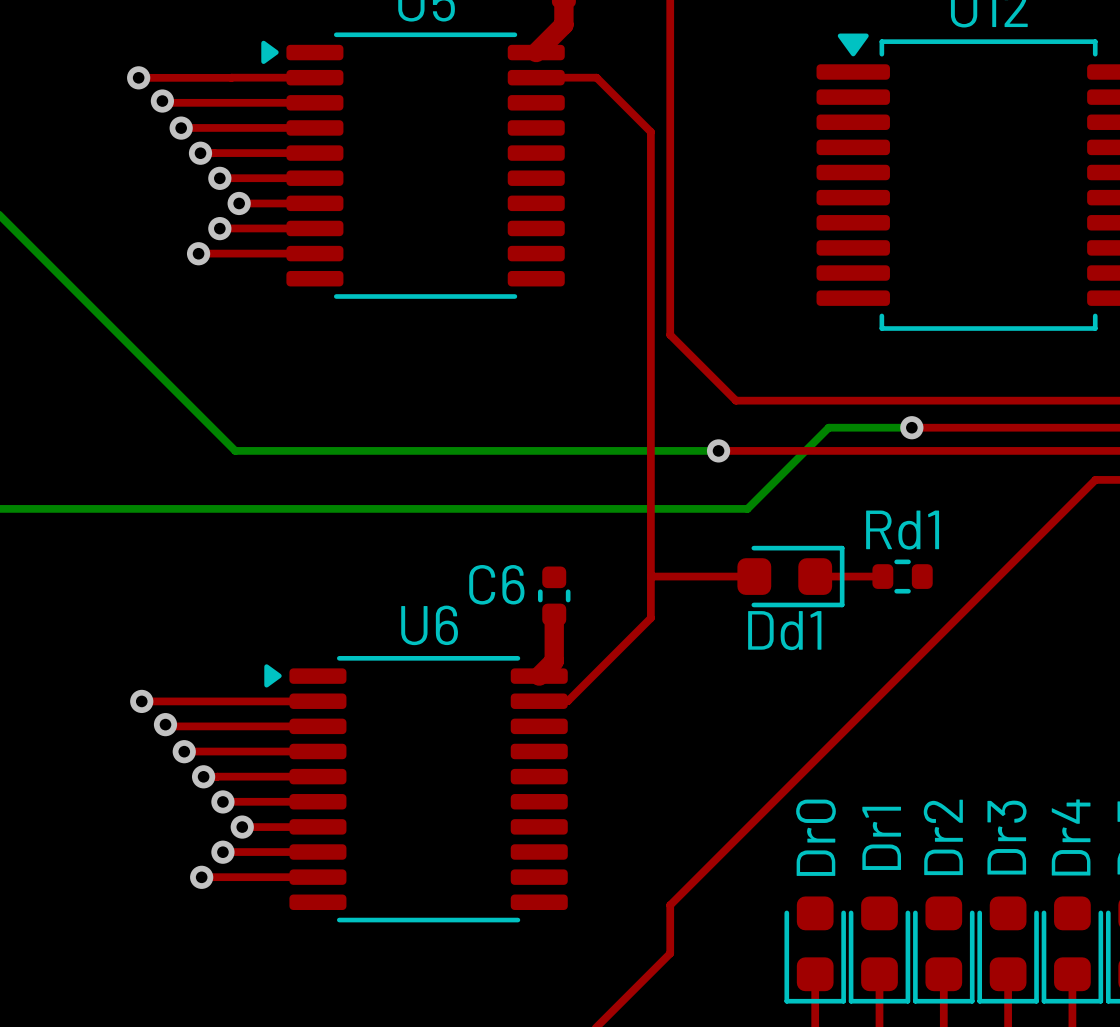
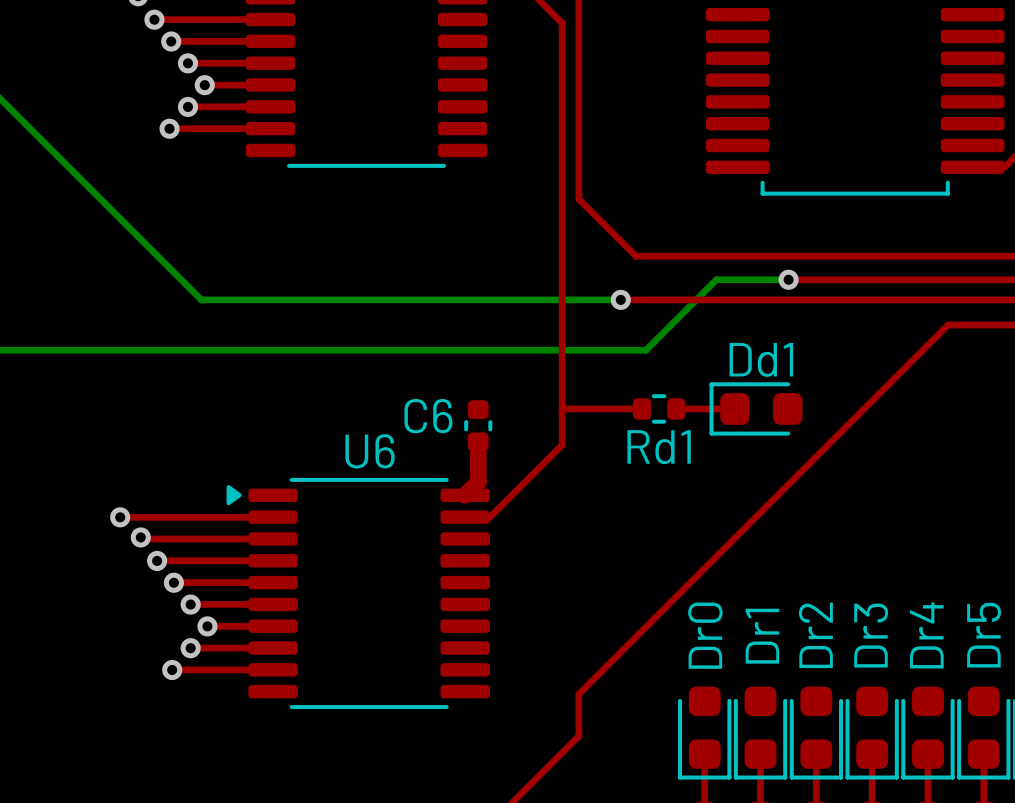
Rd1 name position: Rd1 (902, 530) -> Rd1 (659, 447)
Dd1 rotation: 0° (790, 576) -> 180° (755, 408)
Dd1 position: (790, 576) -> (755, 408)
top track: (849, 576) (882, 576) -> (676, 408) (704, 408)
Rd1 position: (902, 576) -> (659, 408)

